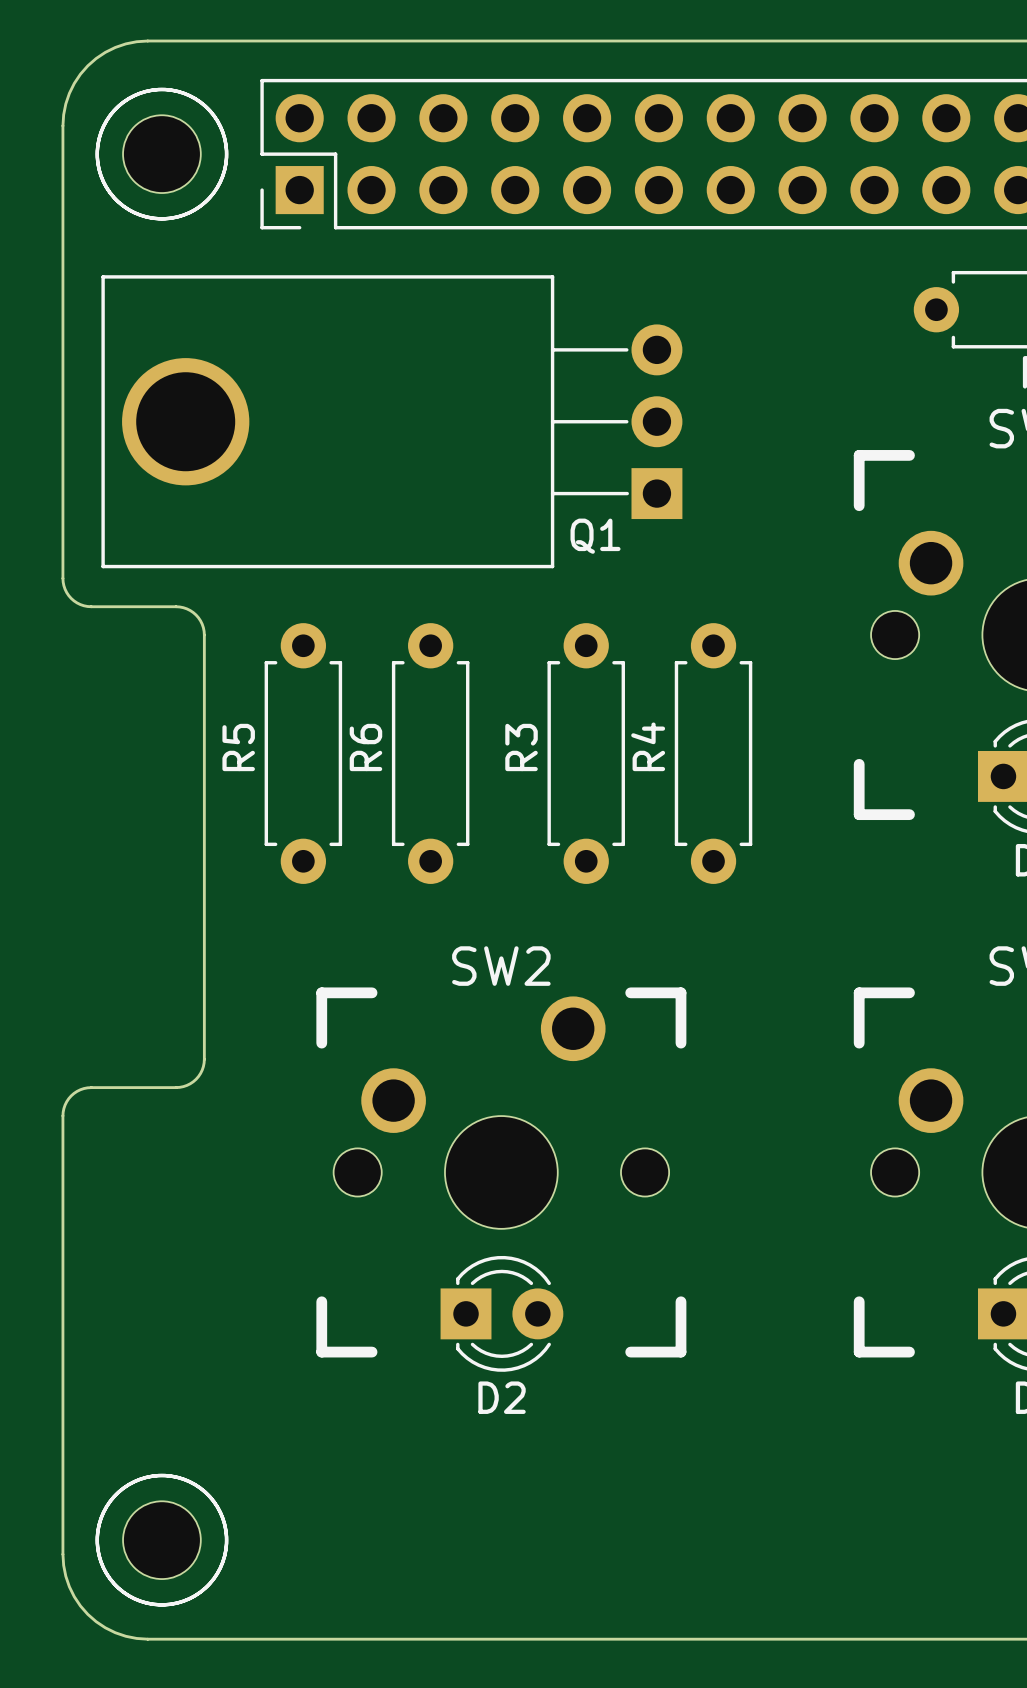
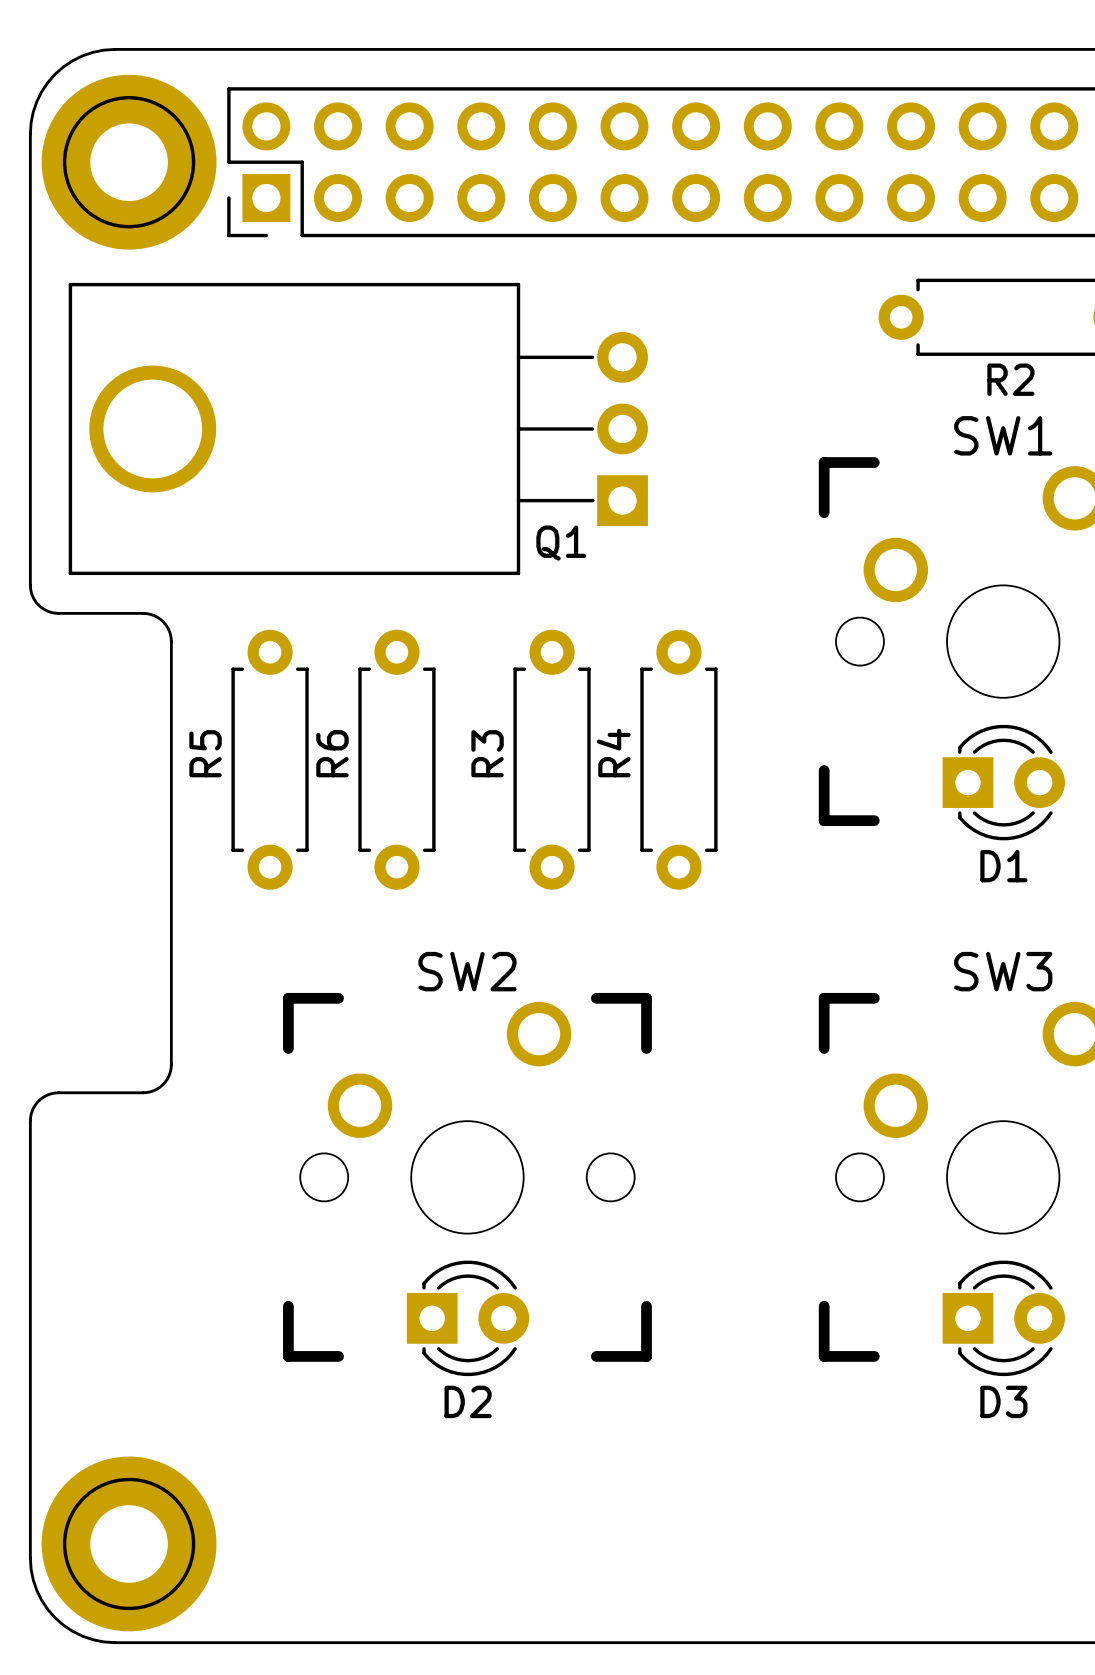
part footprint: [95, 87, 229, 221] -> [41, 74, 217, 250]
drawing: [95, 87, 229, 221] -> none
part footprint: [95, 1473, 229, 1607] -> [41, 1456, 217, 1632]
drawing: [95, 1473, 229, 1607] -> none

